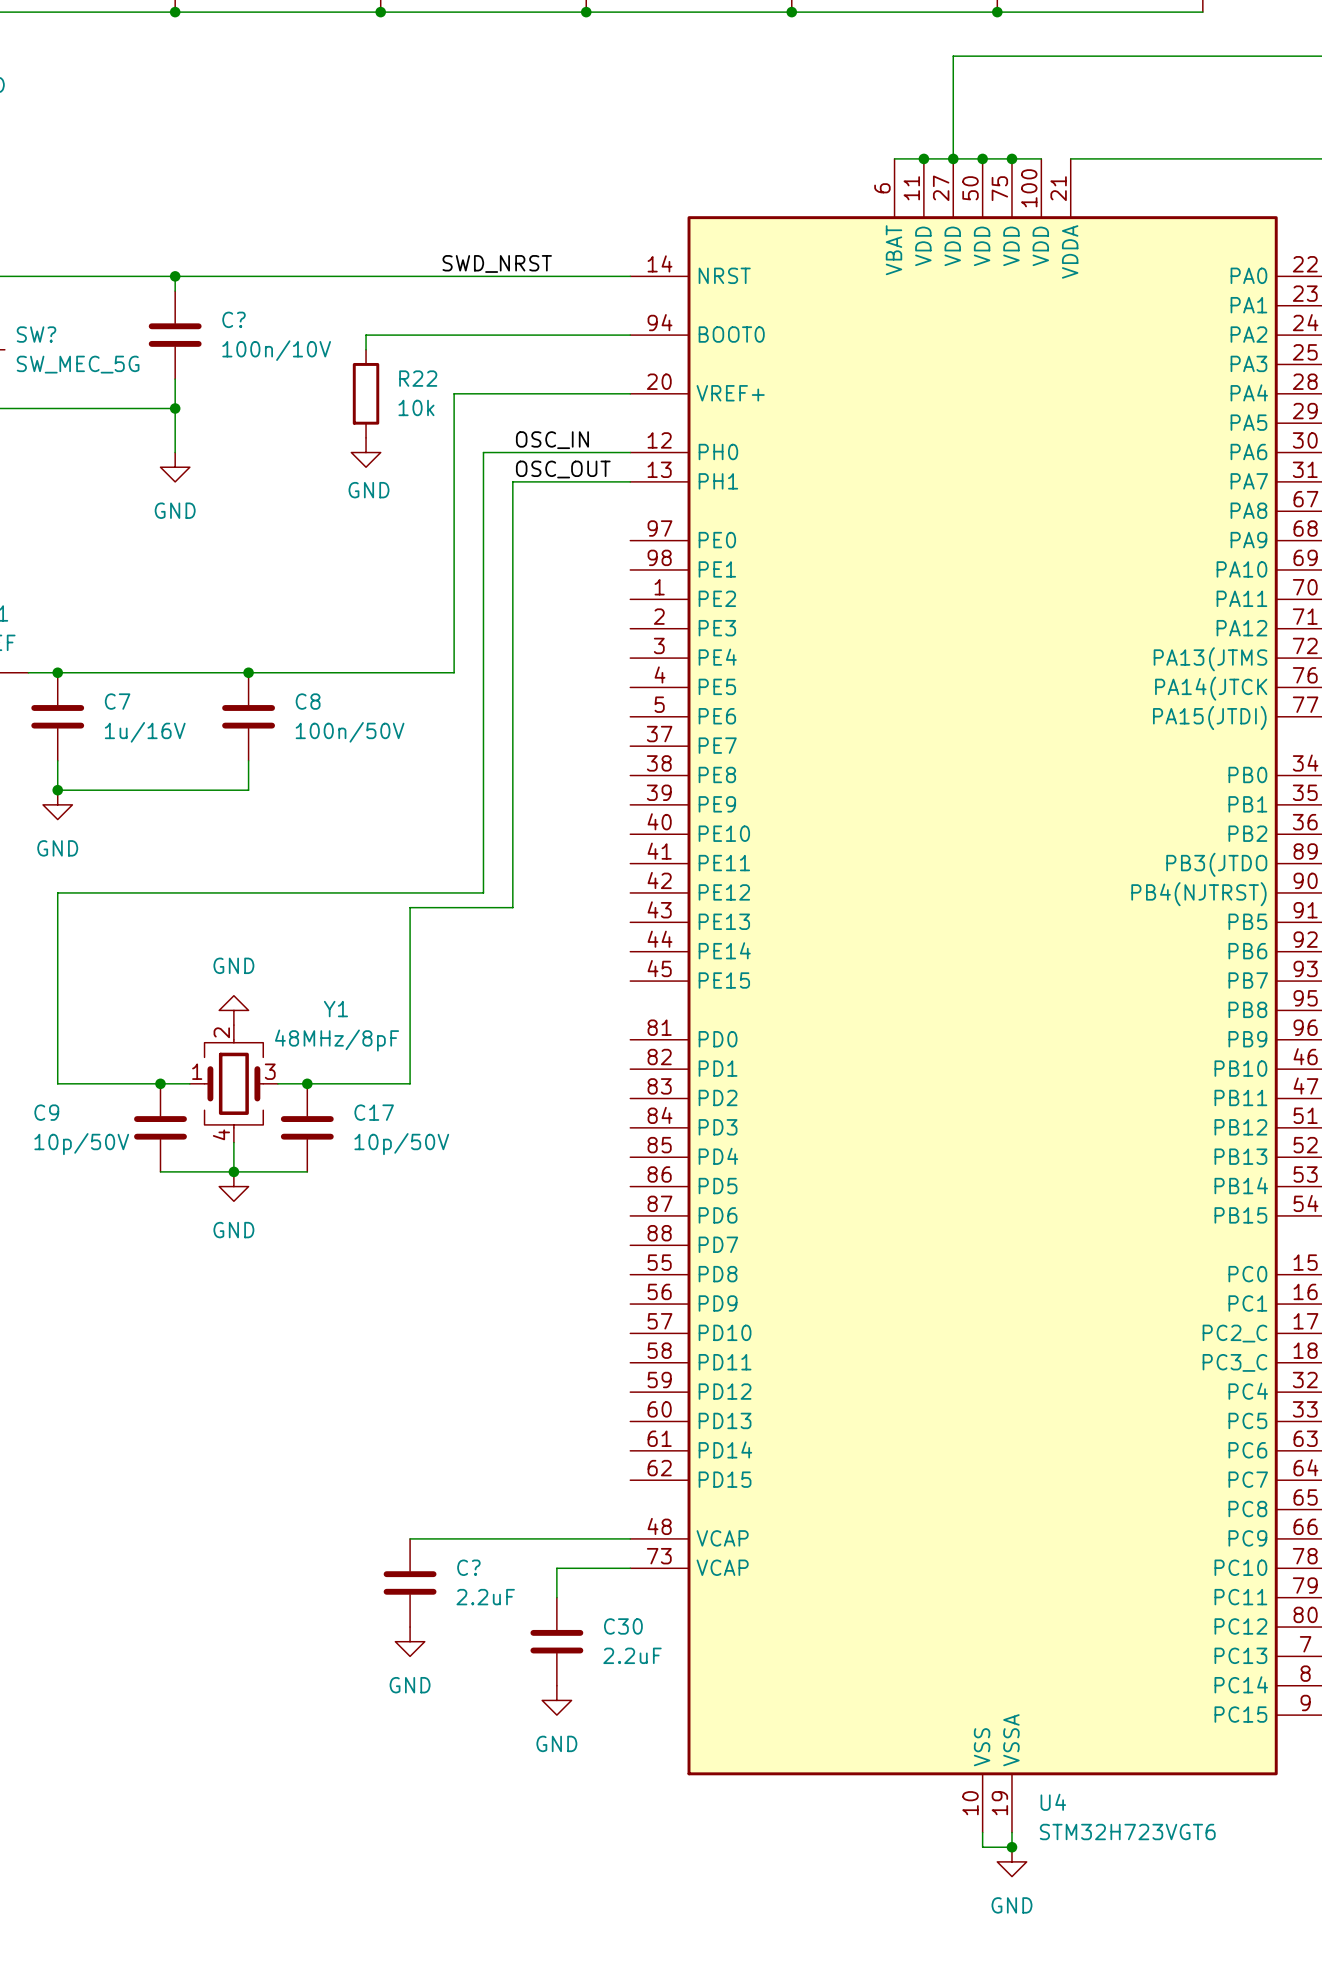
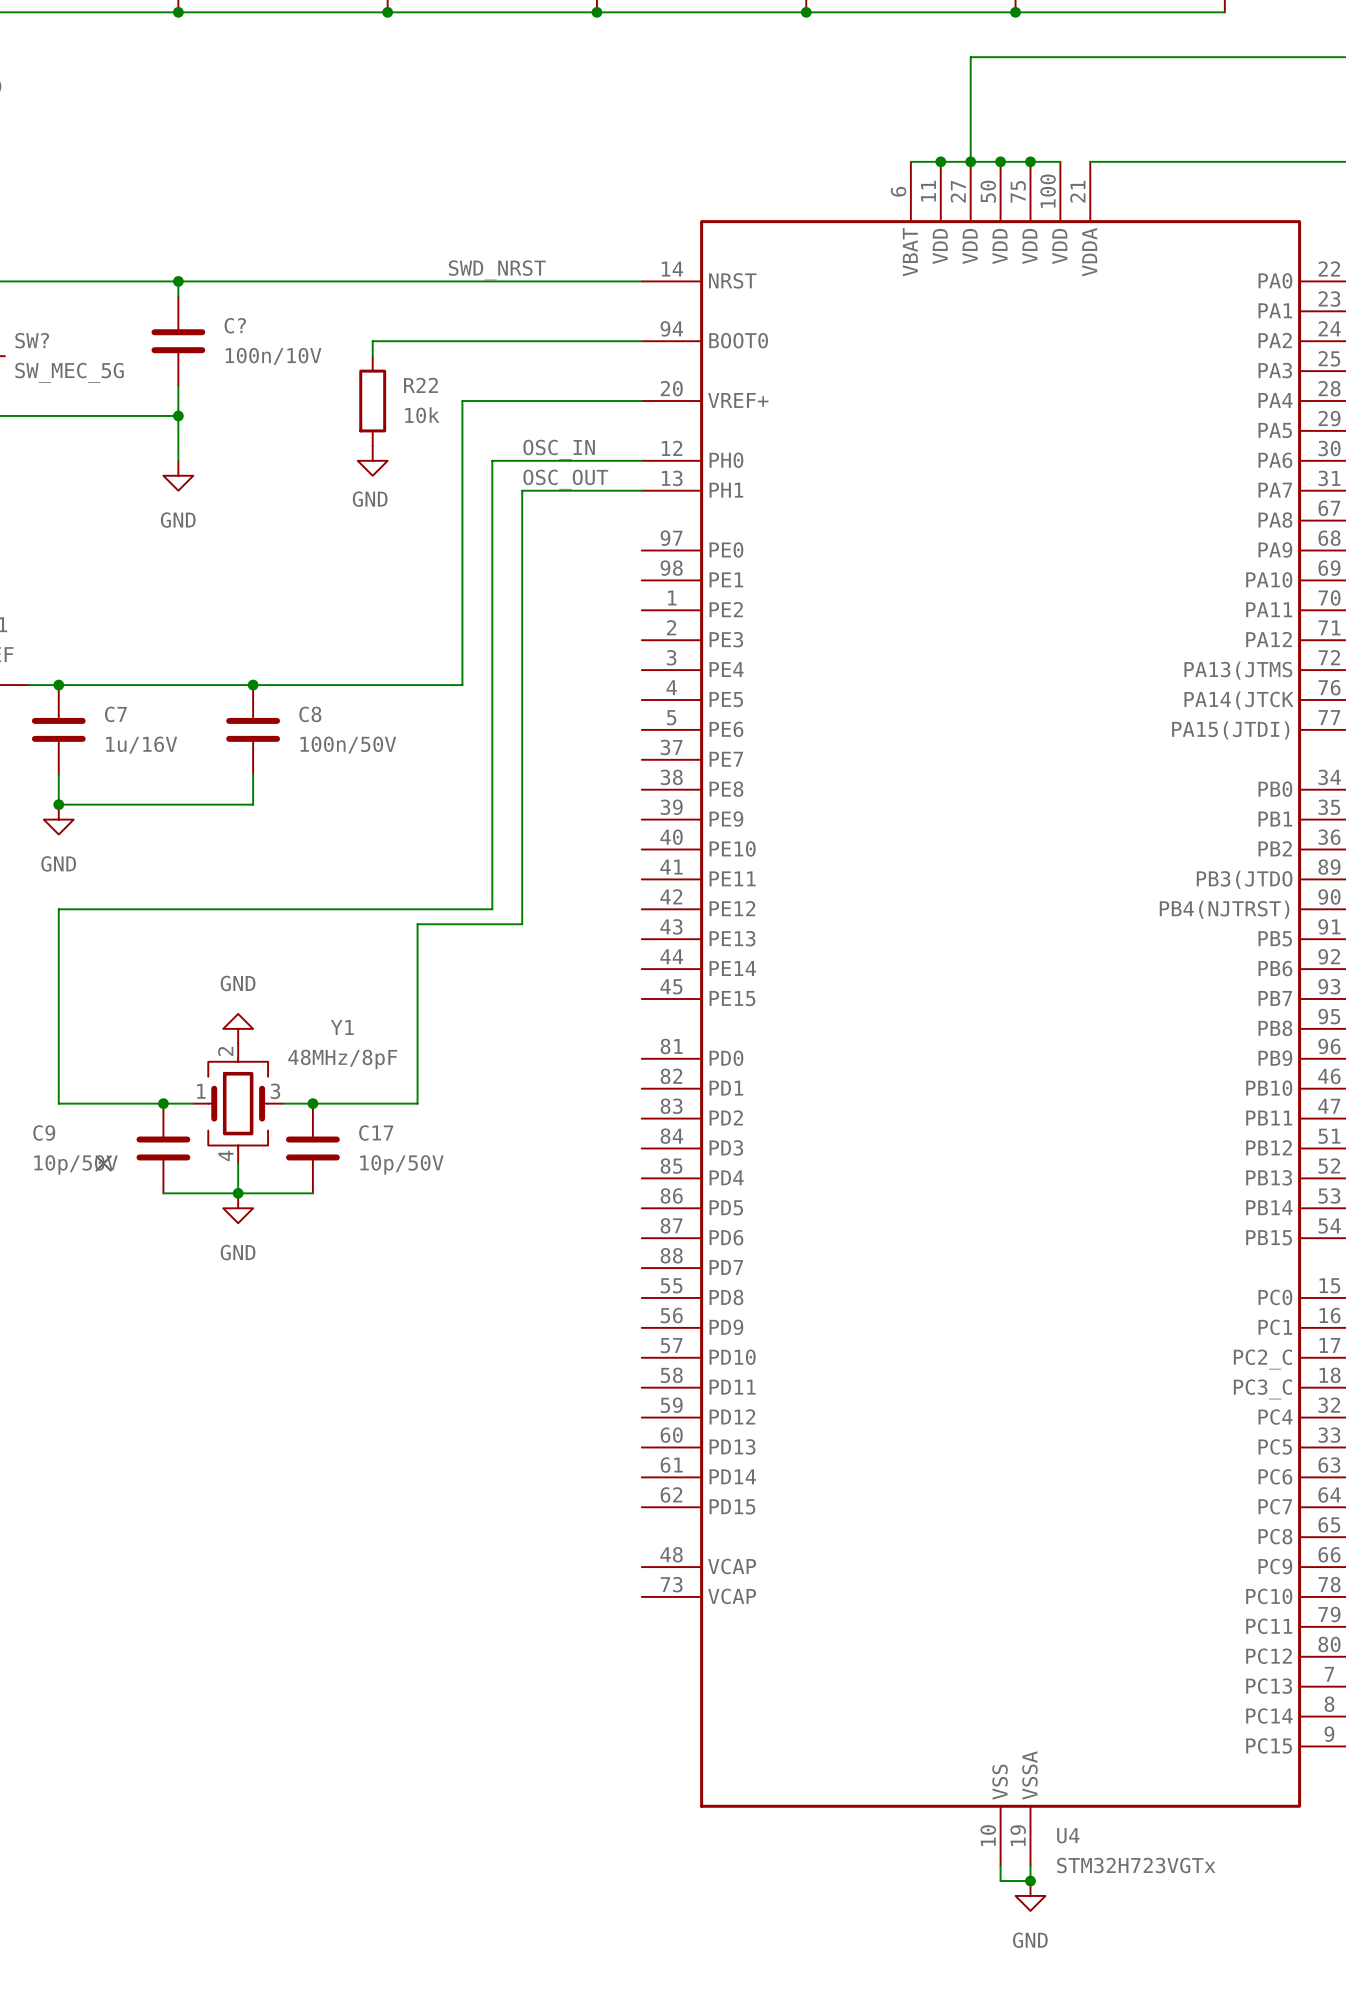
no-connect mark: none -> (103, 1163)
wire: (410, 1538) (630, 1538) -> none
wire: (630, 1568) (556, 1568) (556, 1597) -> none
C?: 2.2uF (410, 1582) -> none
power symbol: GND (410, 1641) -> none
C30: 2.2uF (556, 1641) -> none
power symbol: GND (556, 1700) -> none
U4 value: STM32H723VGT6 (1127, 1832) -> STM32H723VGTx (1136, 1865)

